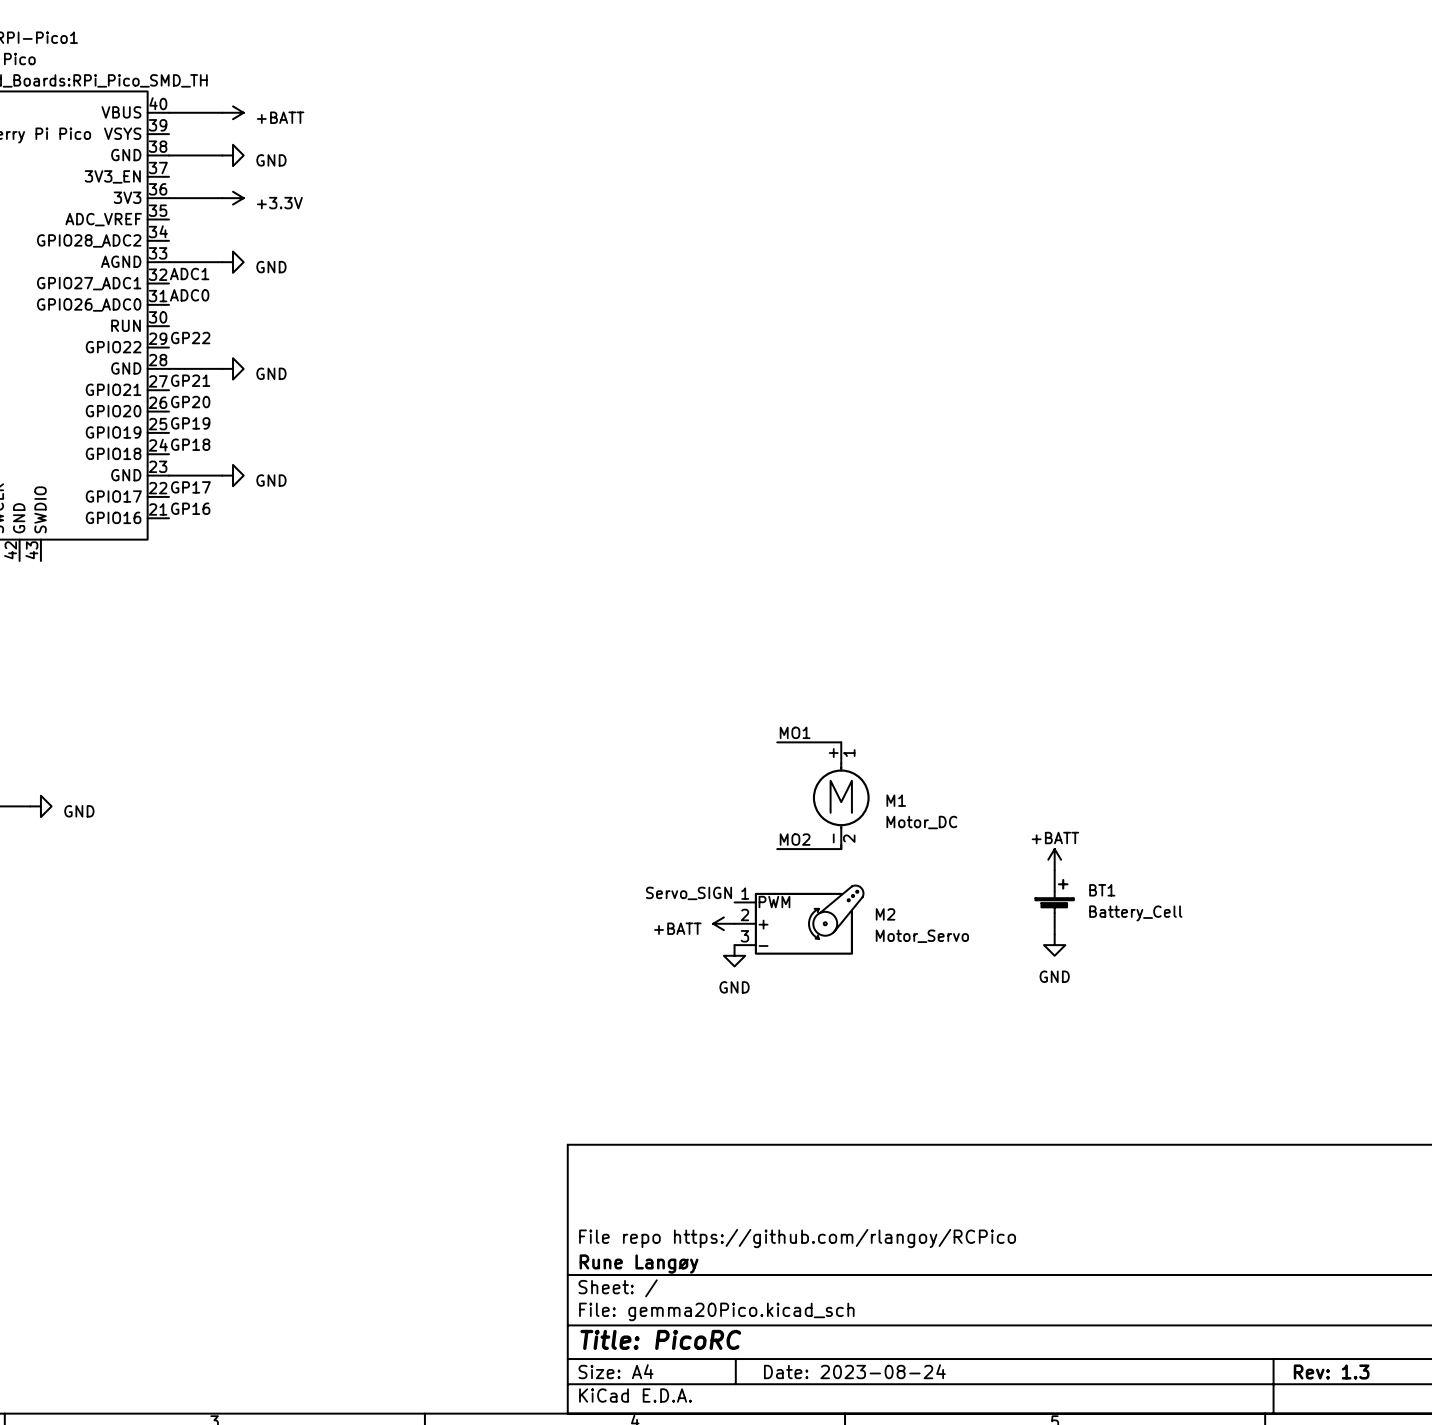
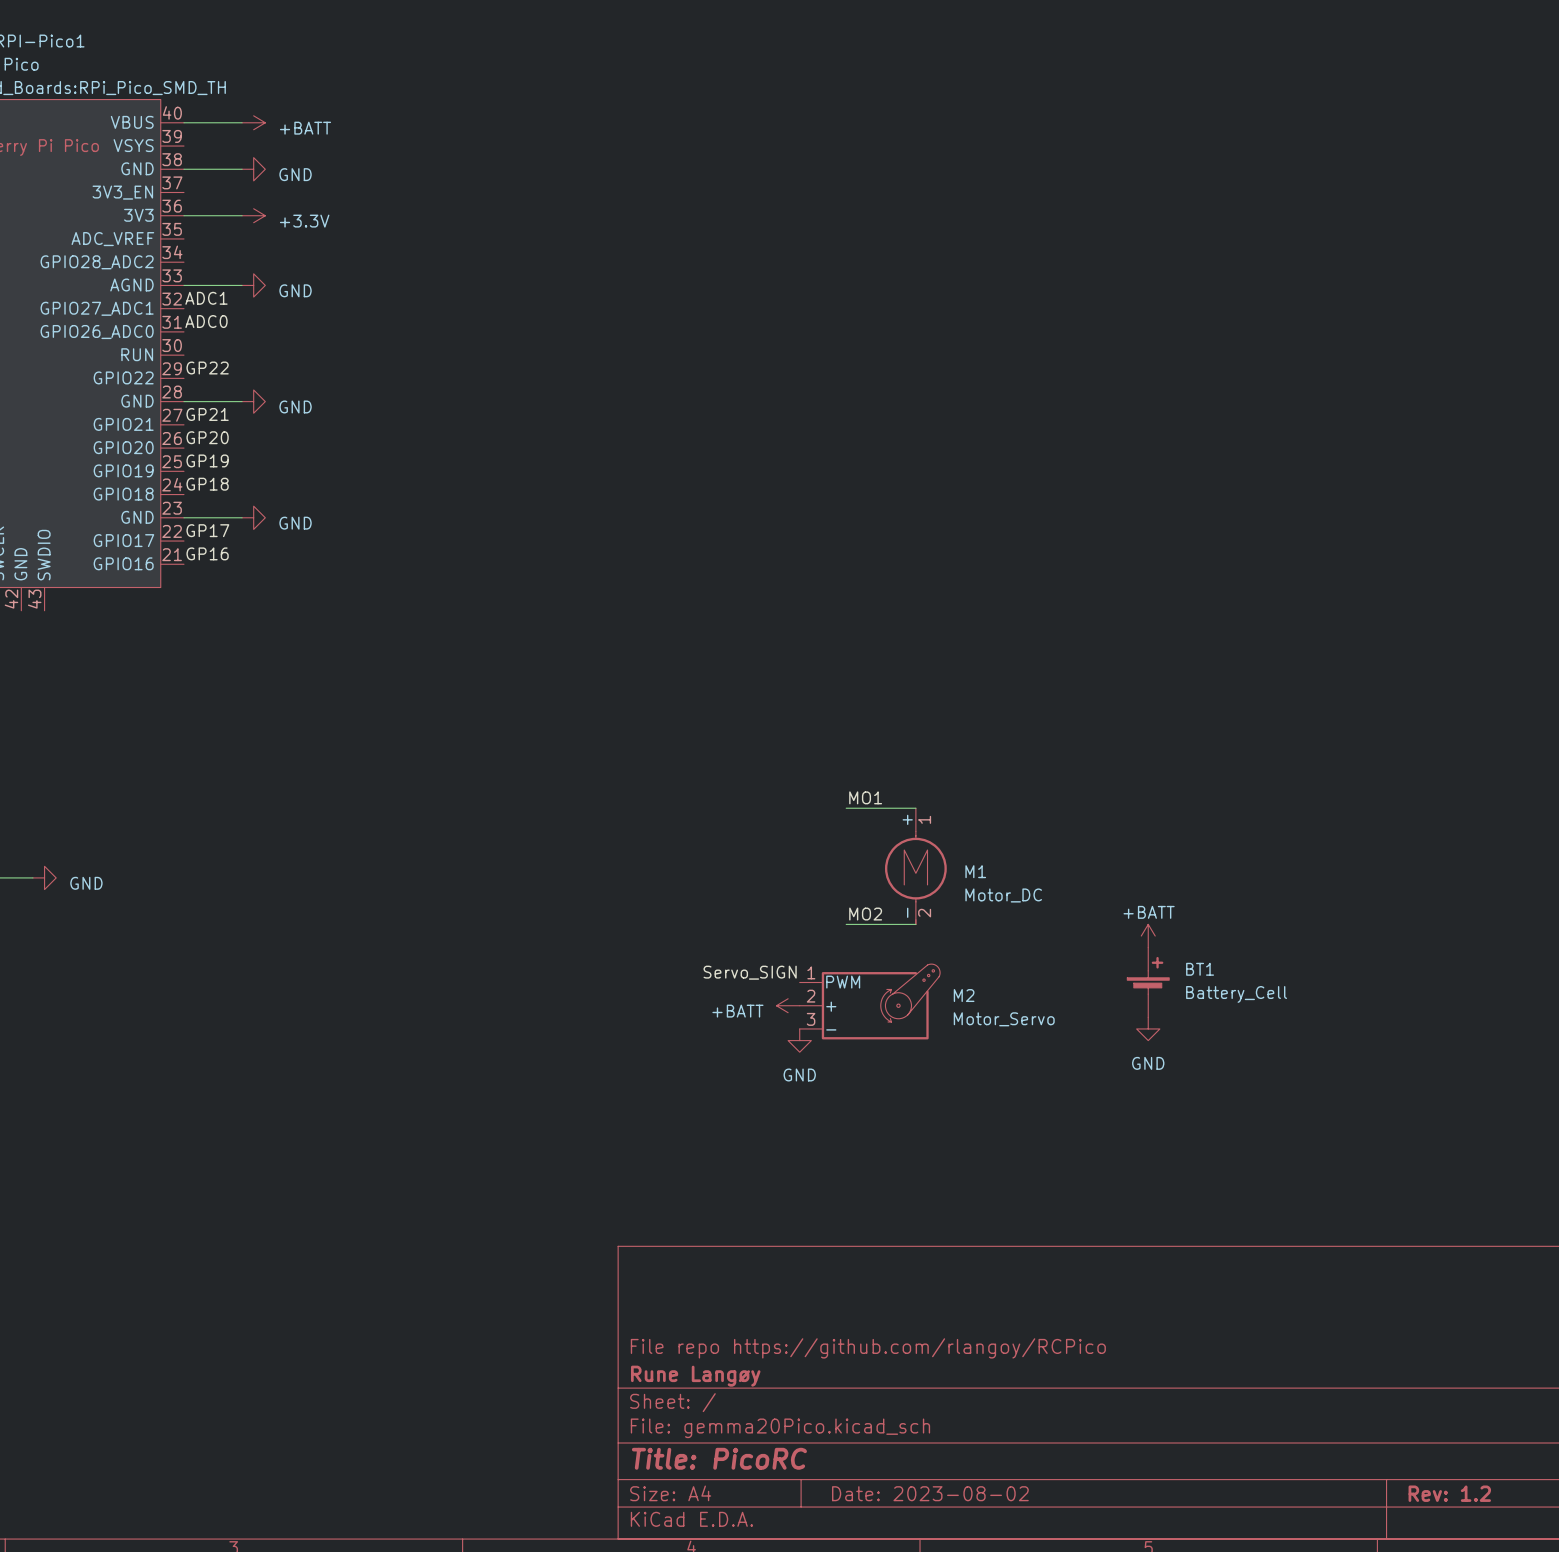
title block: Date: 2023-08-24 (854, 1371) -> Date: 2023-08-02 (930, 1493)
title block: Rev: 1.3 (1331, 1371) -> Rev: 1.2 (1449, 1493)

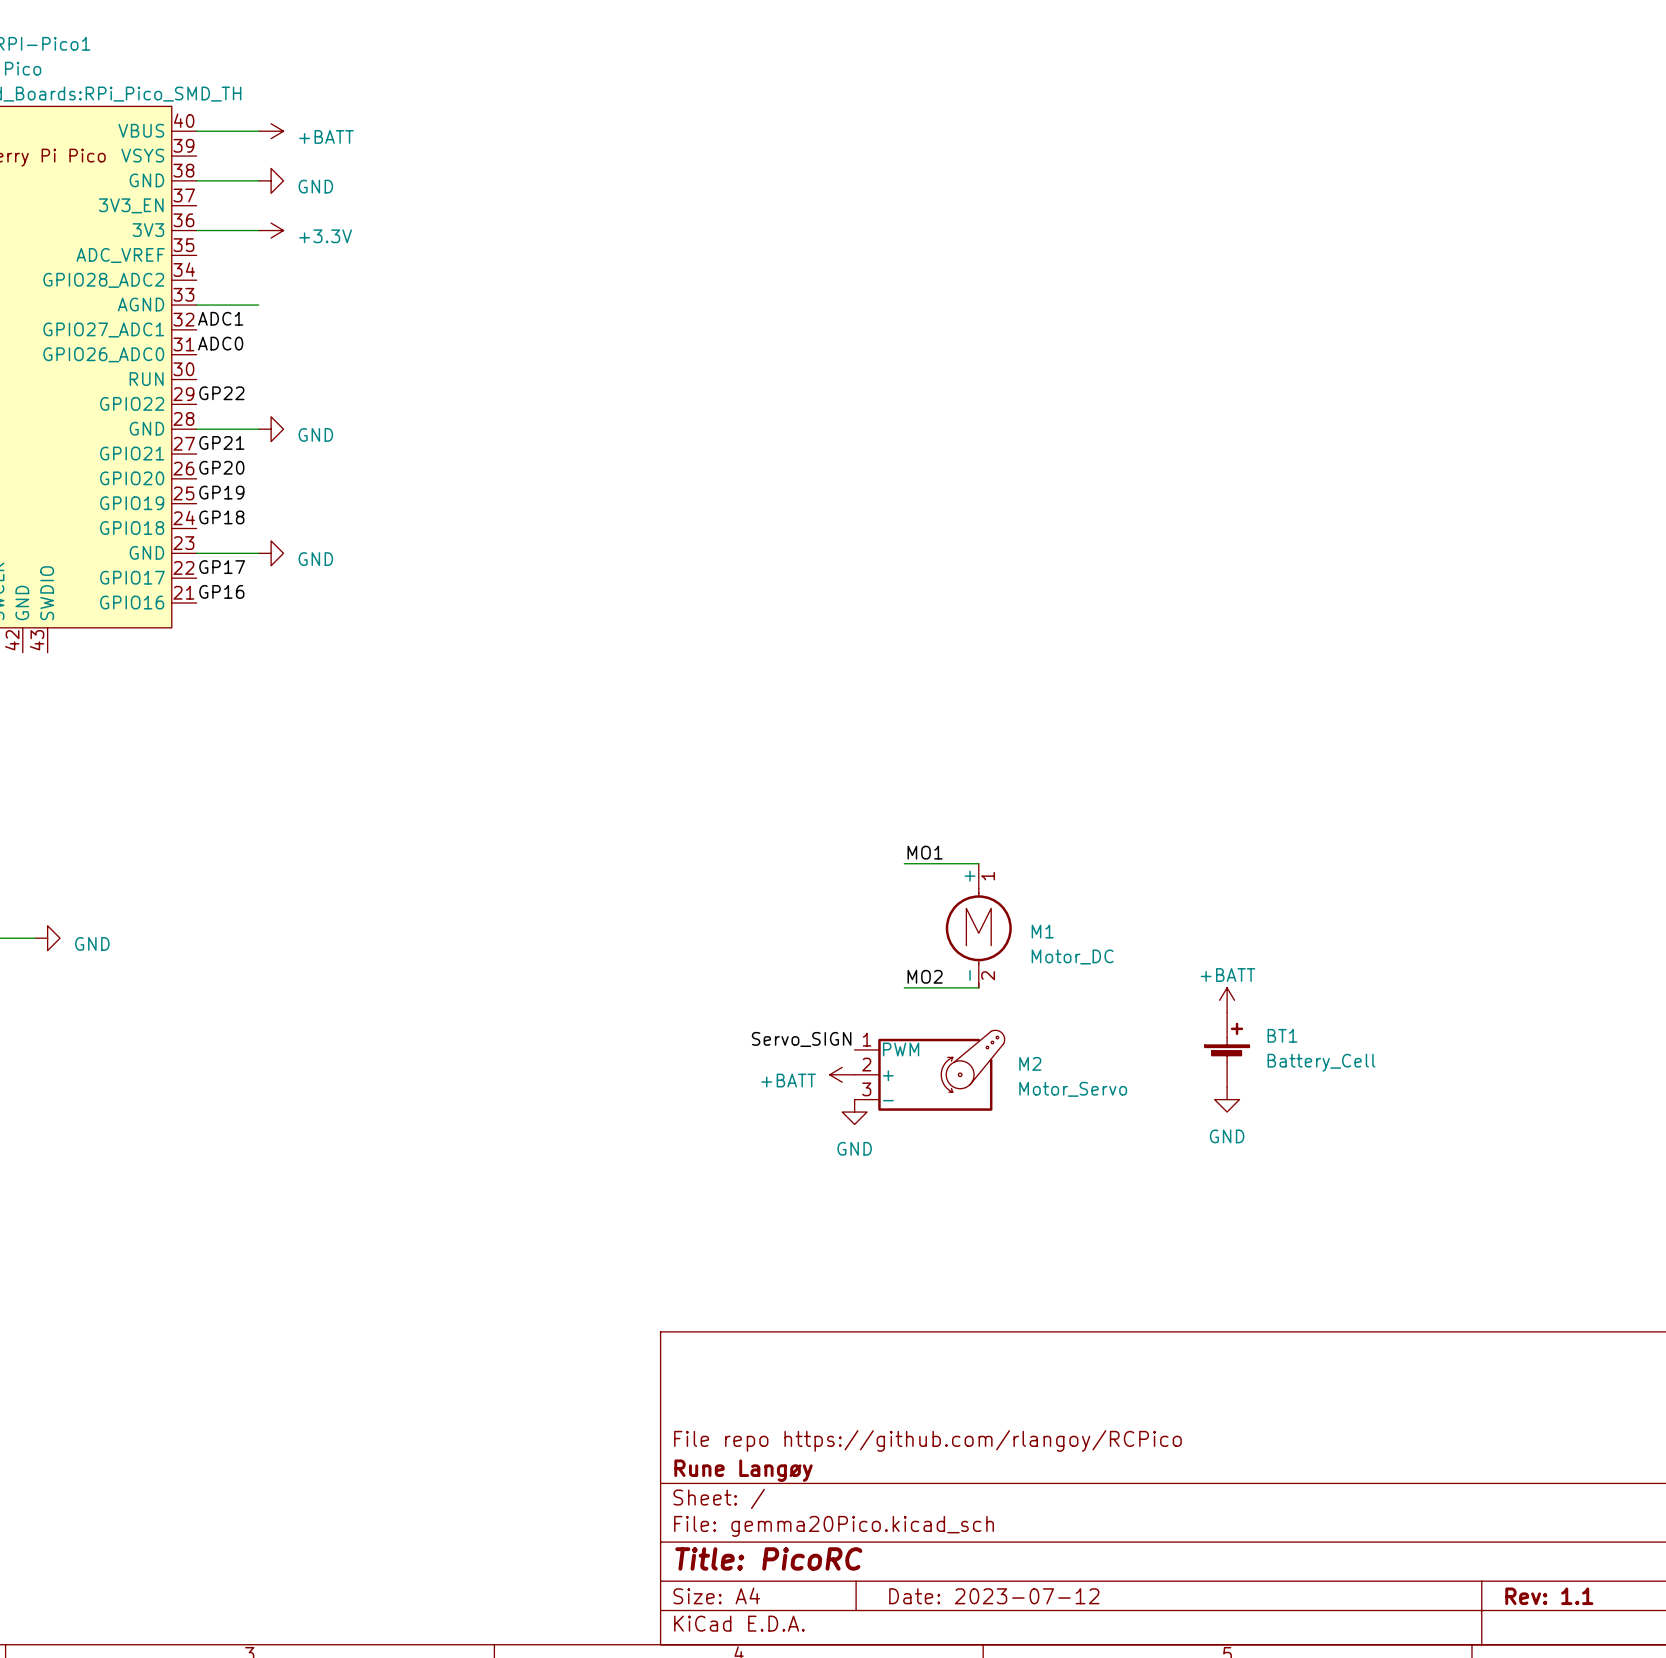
power symbol: GND (253, 285) -> none
title block: Date: 2023-08-02 (930, 1493) -> Date: 2023-07-12 (994, 1596)
title block: Rev: 1.2 (1449, 1493) -> Rev: 1.1 (1549, 1596)

